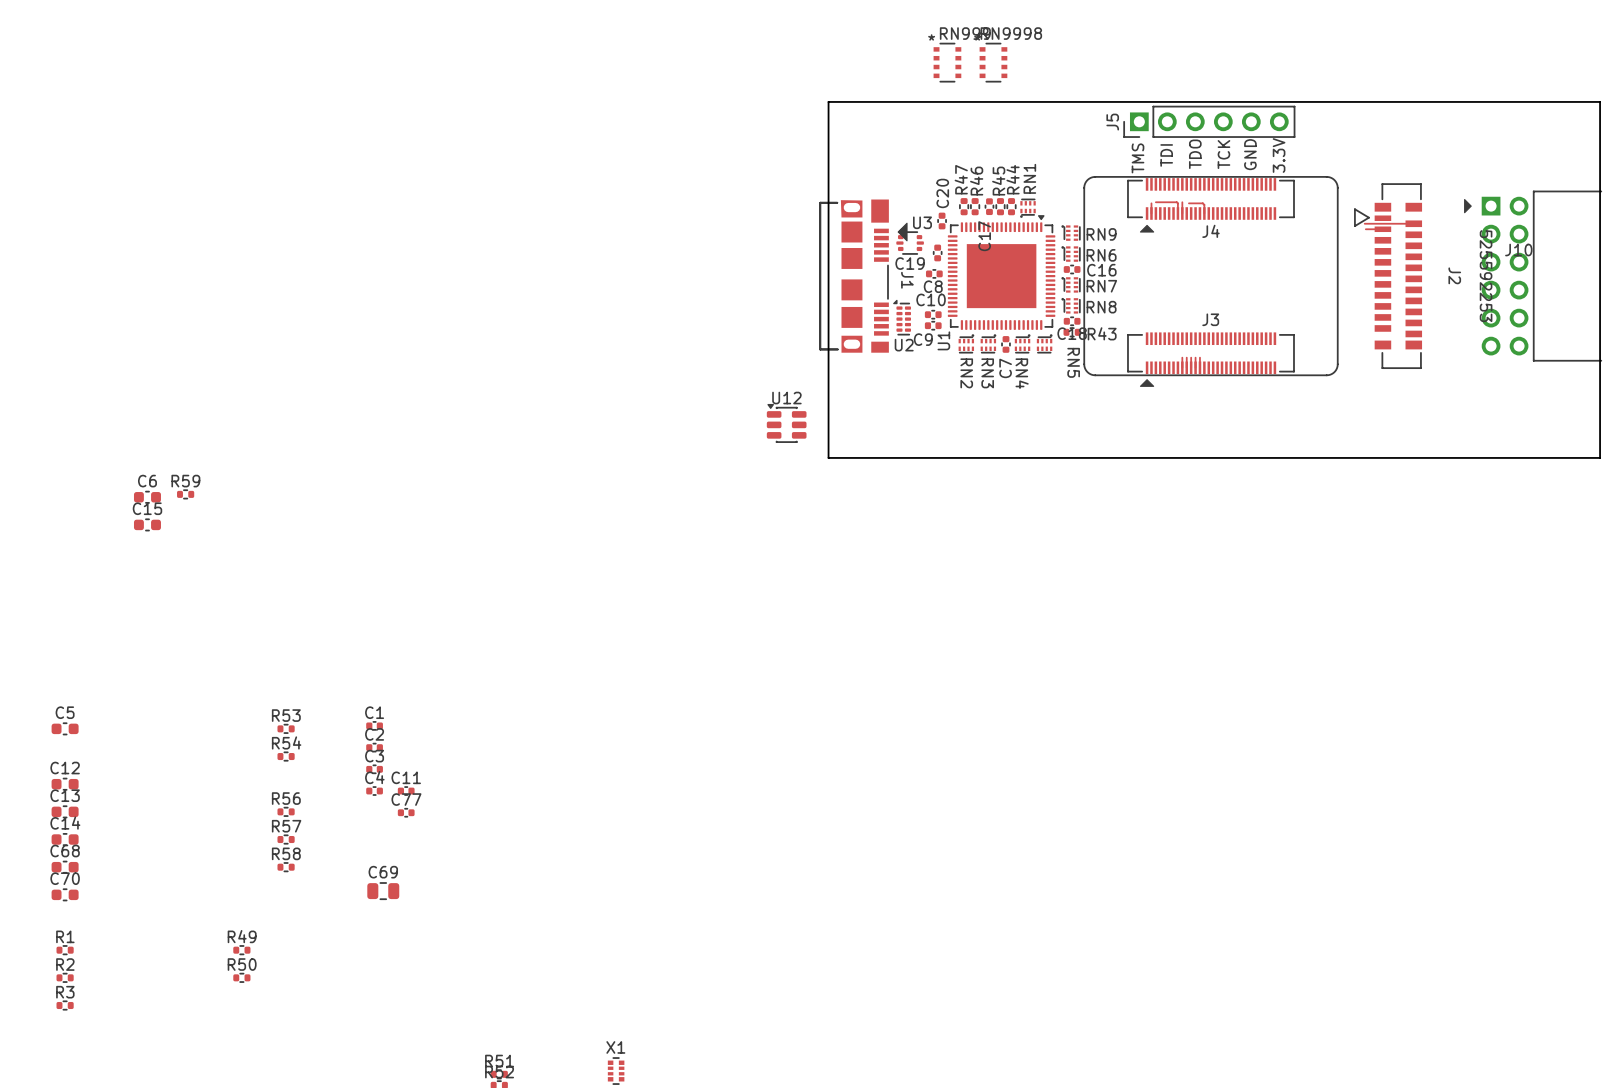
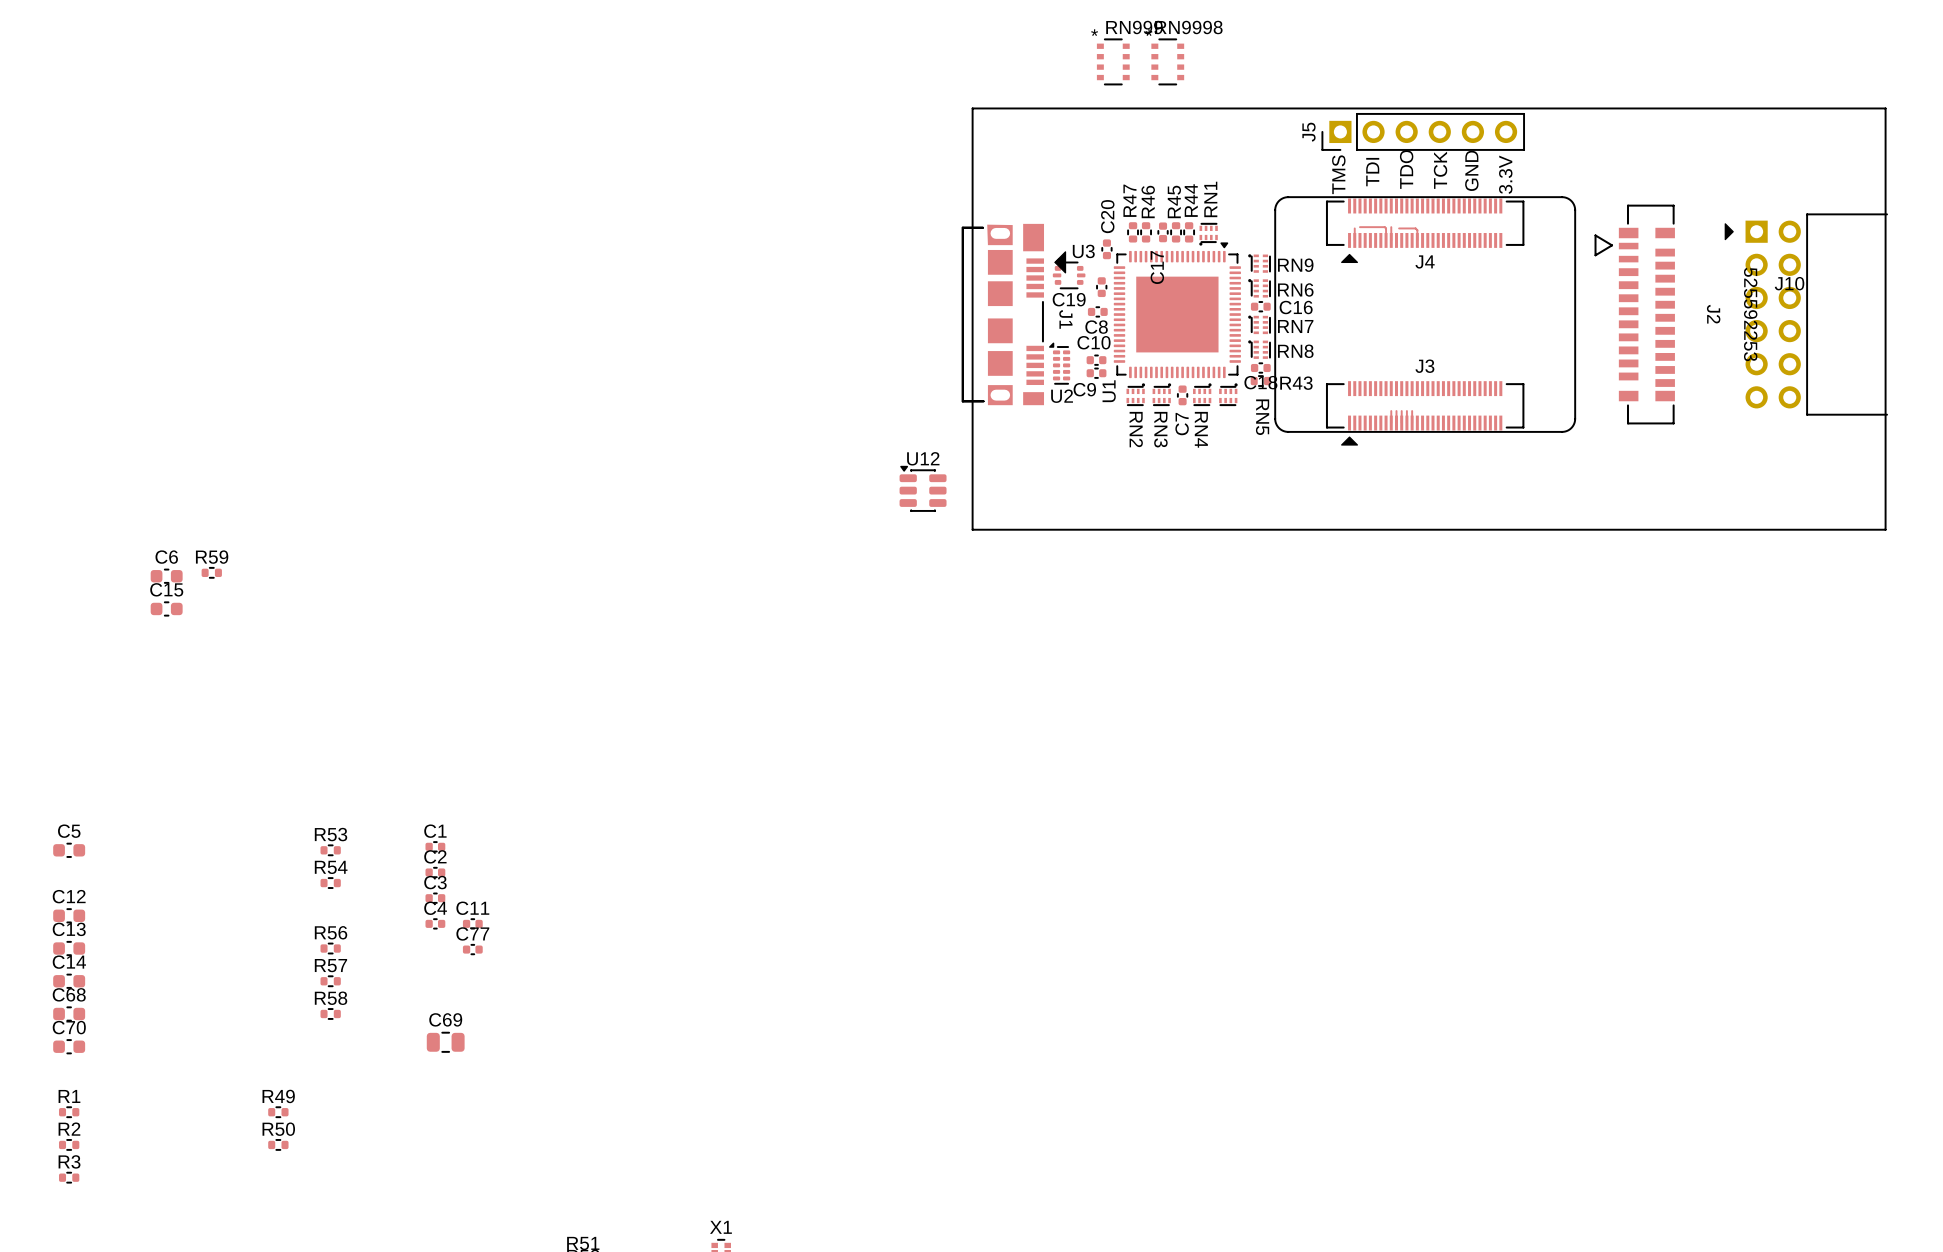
top track: (1364, 223) (1413, 223) -> none
top track: (1365, 229) (1382, 229) -> none

